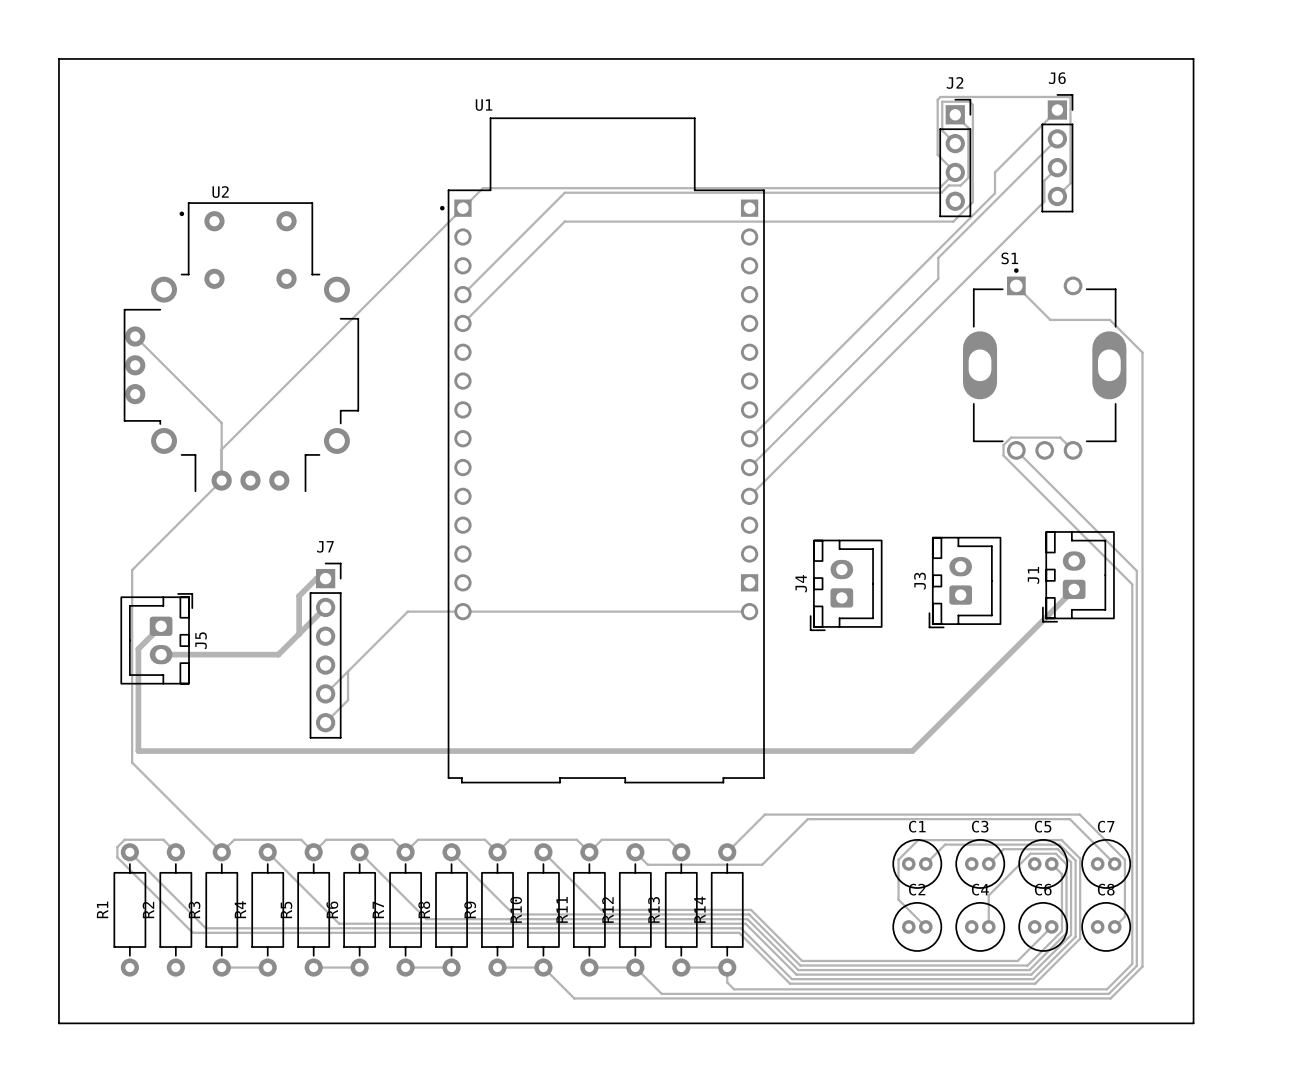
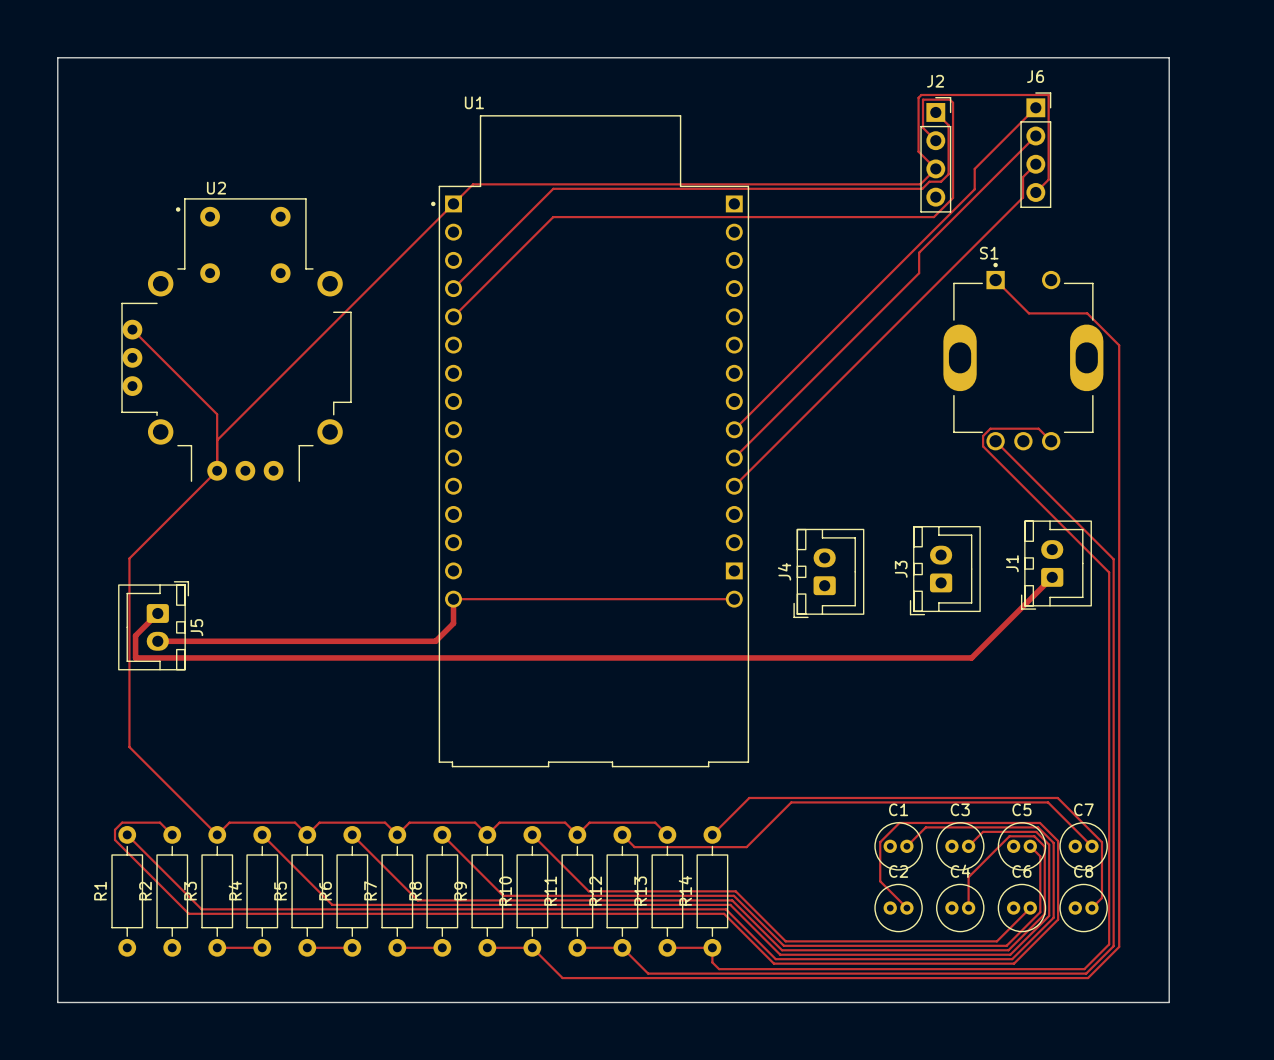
track: (325, 578) (316, 578) (299, 595) (299, 633) -> none
track: (325, 607) (278, 654) -> none
track: (462, 611) (407, 611) (325, 693) -> (453, 599) (453, 623) (435, 641) (272, 641)
J7: (325, 650) -> none
track: (138, 671) (138, 751) (912, 751) (991, 671) -> (135, 657) (971, 657)
track: (348, 671) (348, 700) (325, 722) -> none

